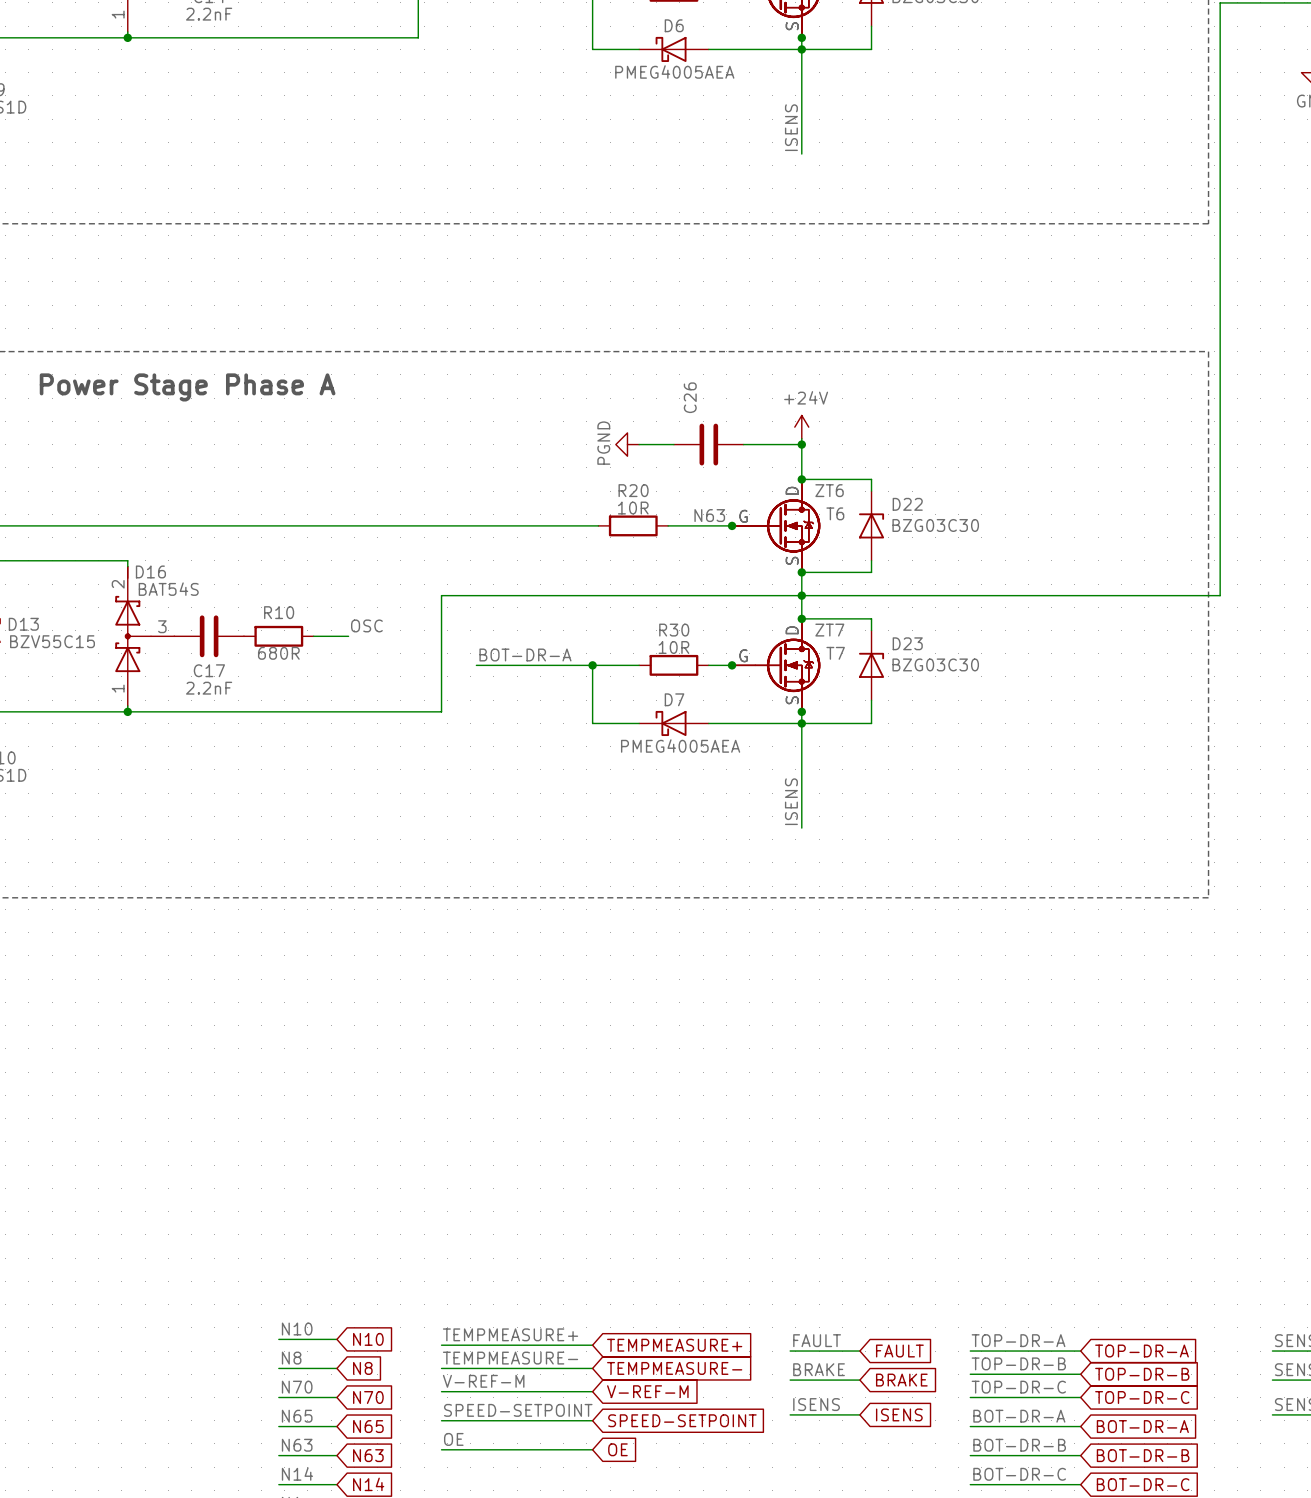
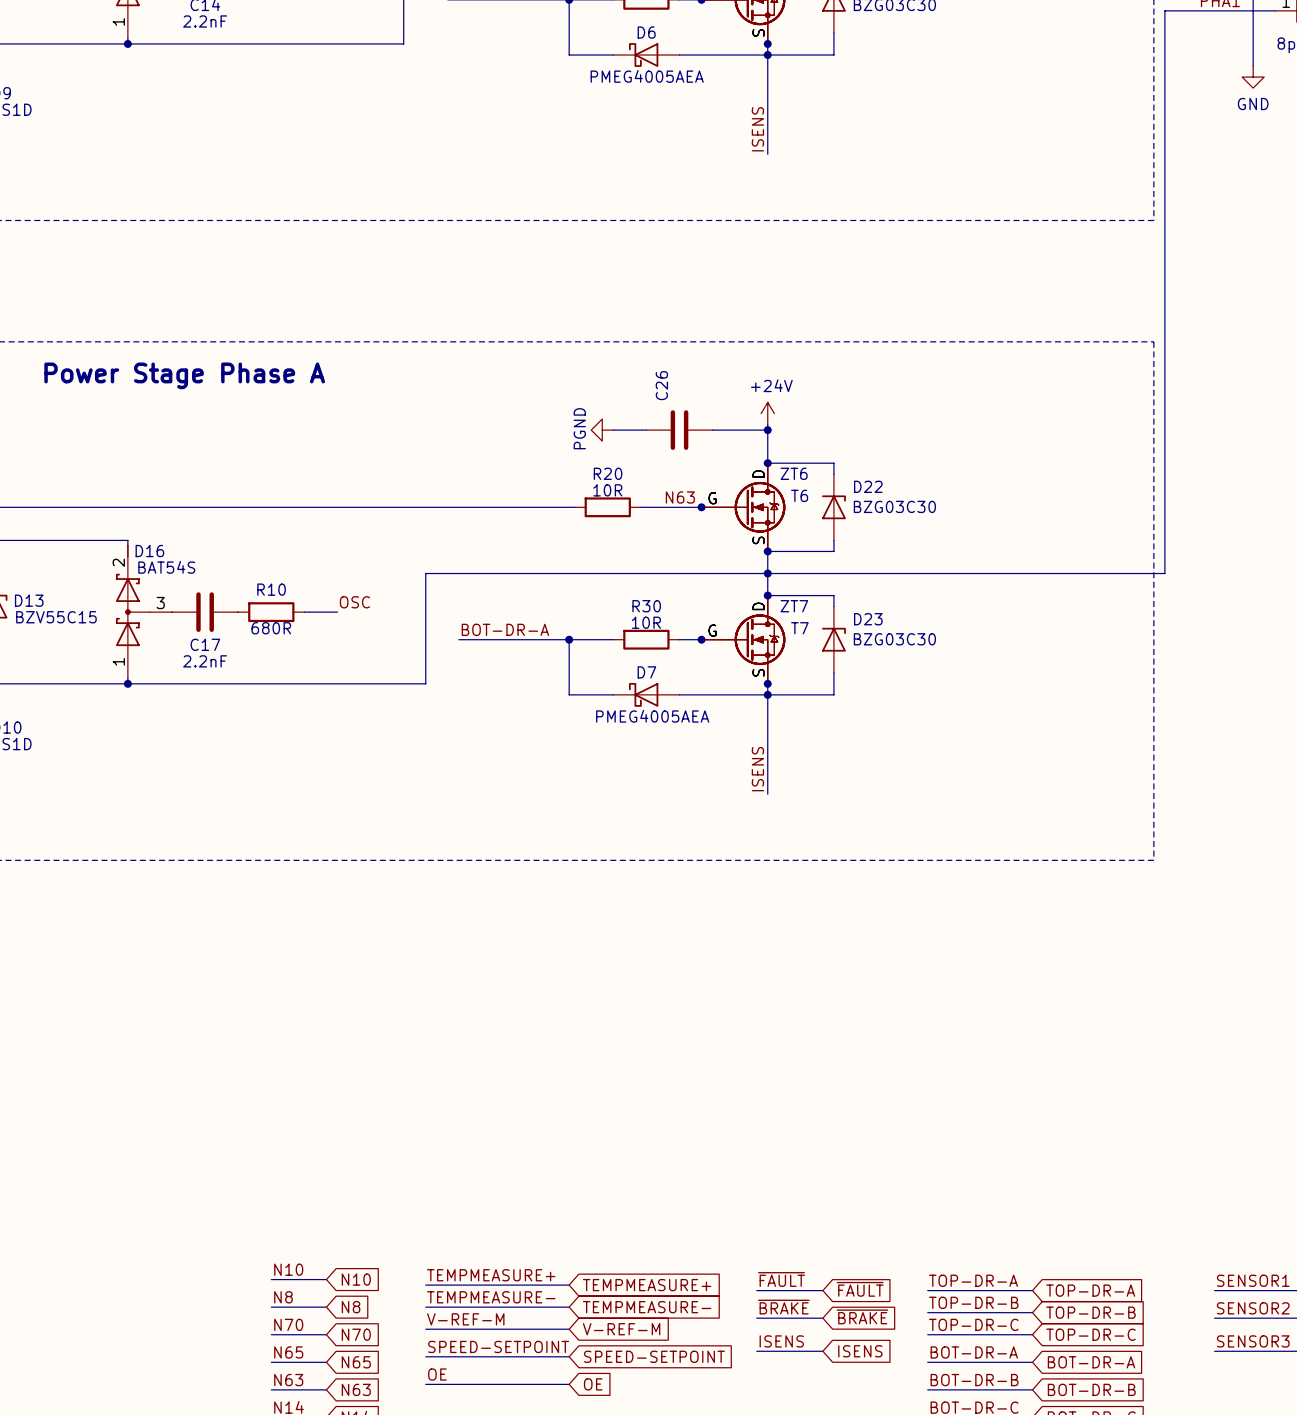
label: FAULT (817, 1340) -> ~{FAULT} (781, 1279)
global label: FAULT (899, 1351) -> ~{FAULT} (860, 1289)
label: BRAKE (819, 1369) -> ~{BRAKE} (783, 1307)
global label: BRAKE (901, 1380) -> ~{BRAKE} (862, 1316)

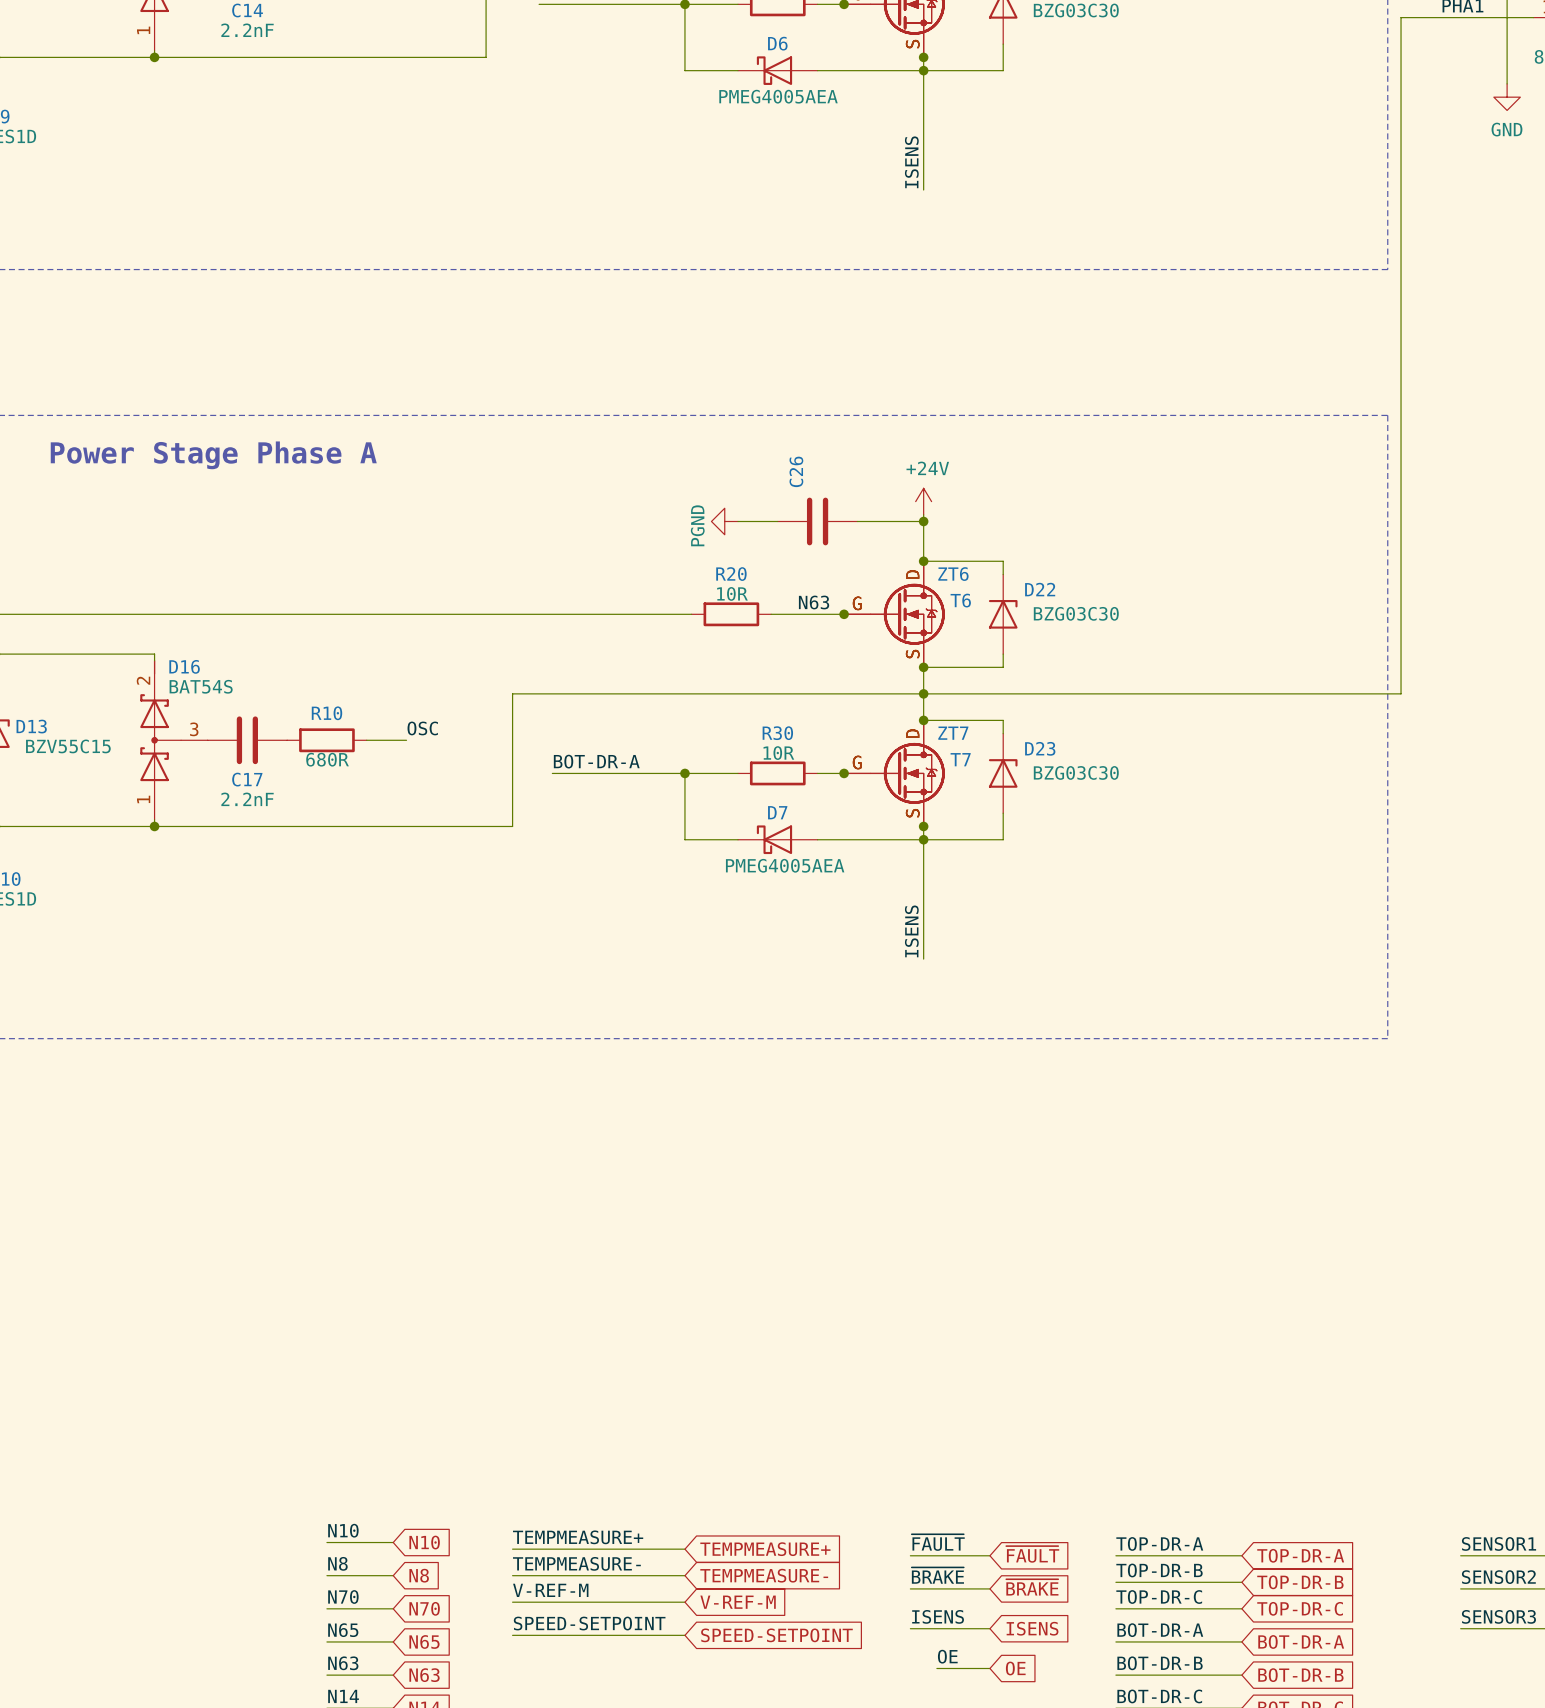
label: OE (437, 1374) -> none
label: none -> OE (947, 1656)
wire: (425, 1384) (569, 1384) -> none
global label: OE (593, 1384) -> none
wire: none -> (936, 1668) (989, 1668)
global label: none -> OE (1015, 1668)

